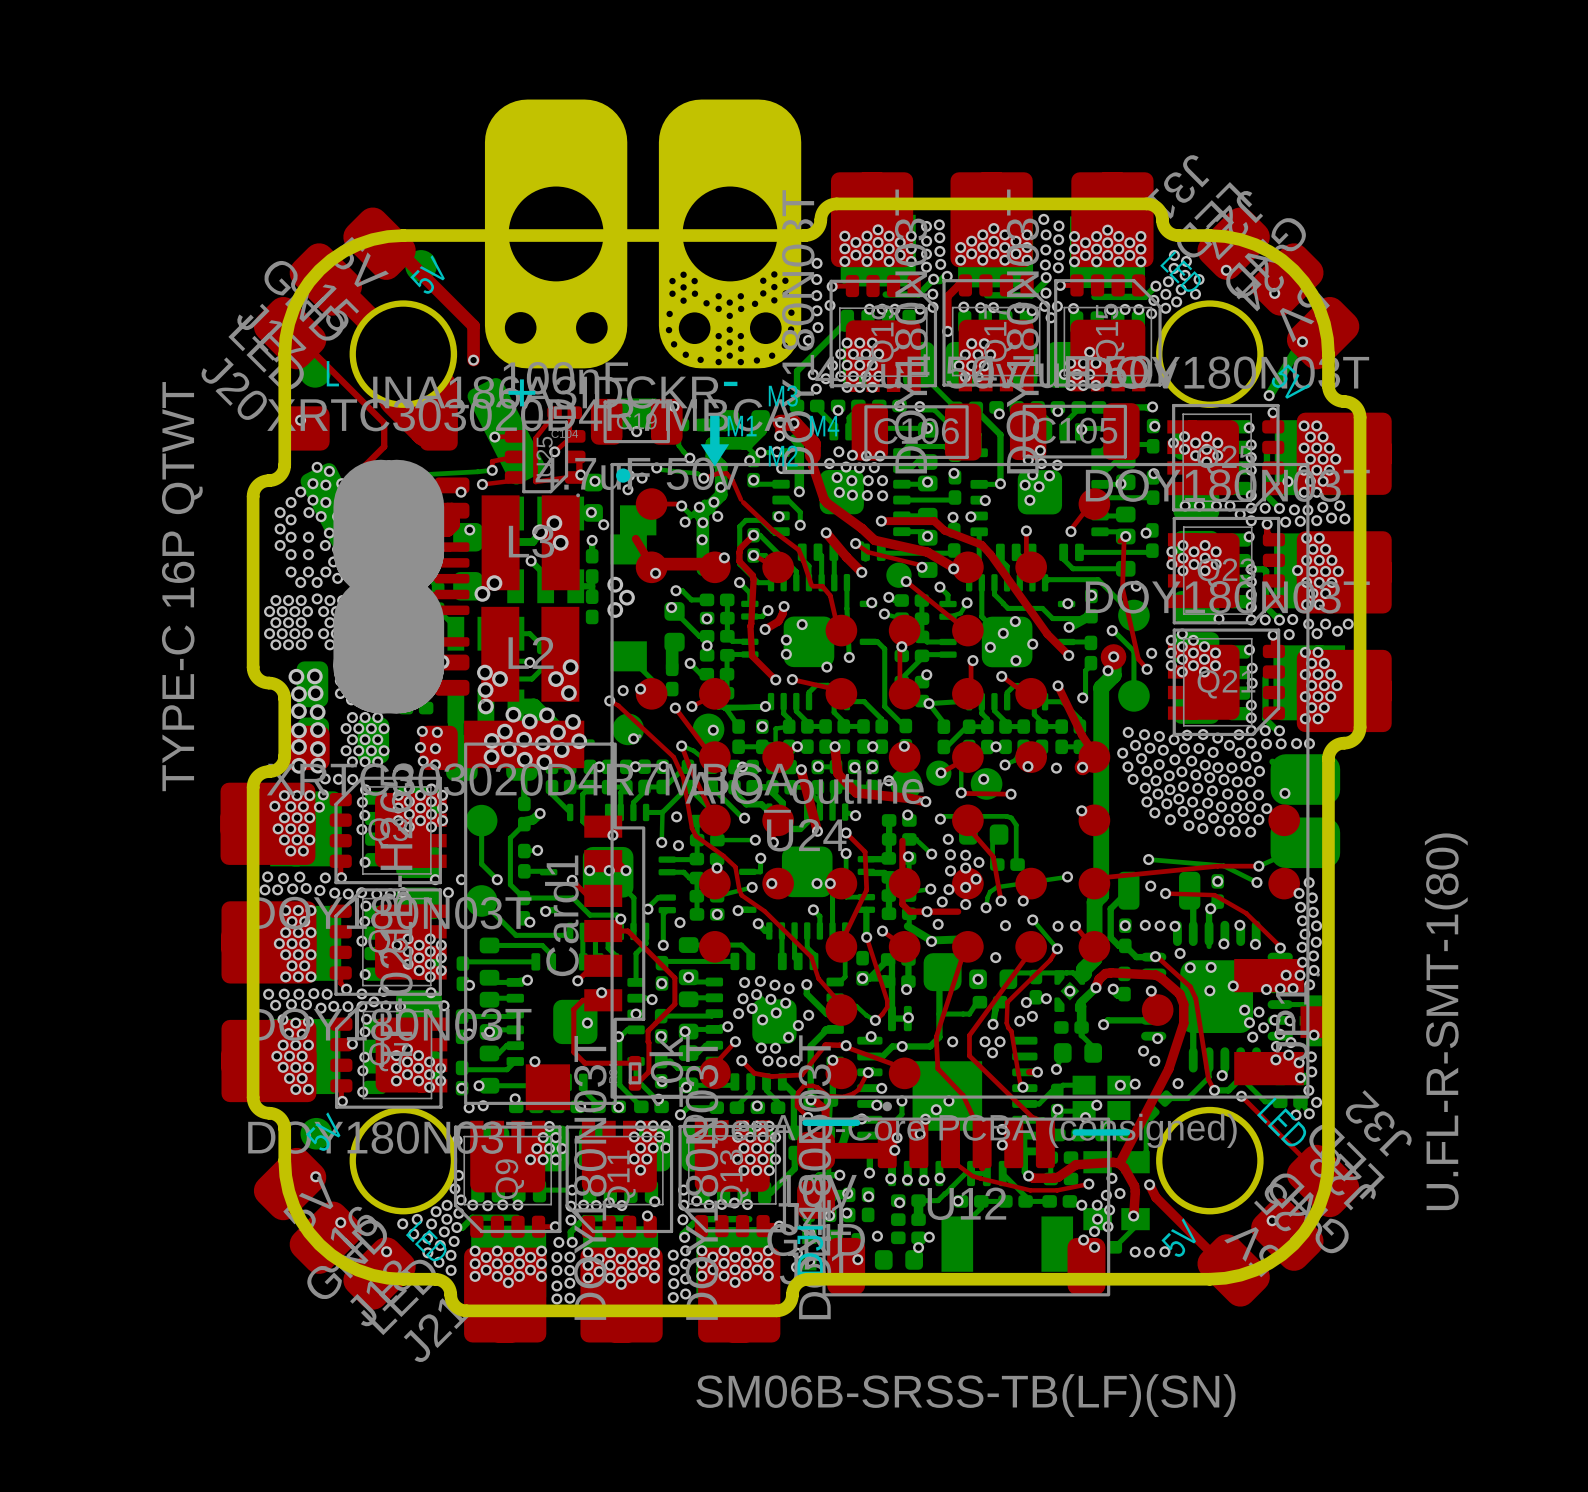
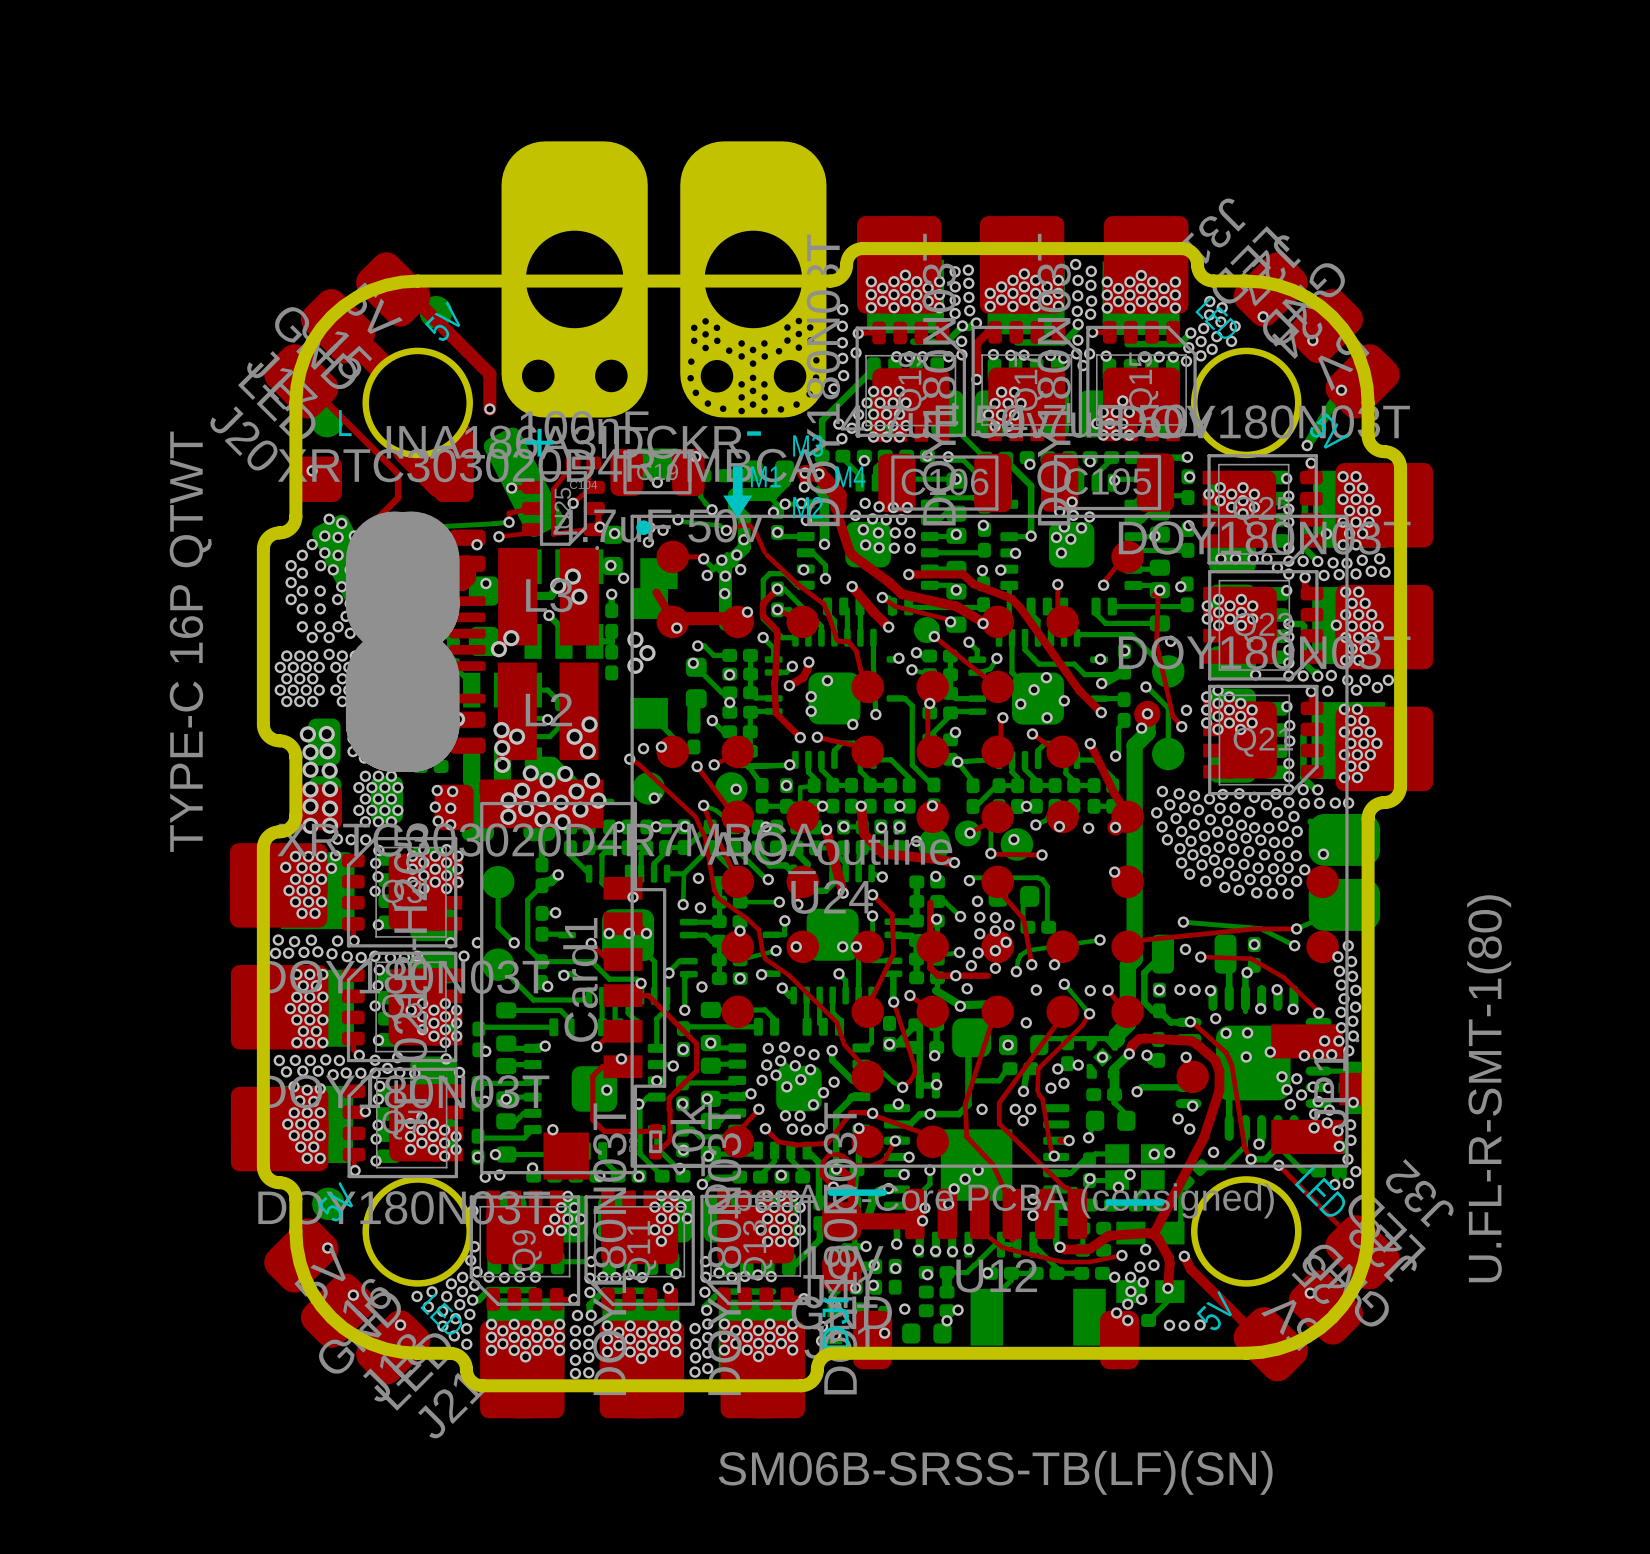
U12 footprint: [822, 1101, 1111, 1297] -> [853, 1188, 1140, 1370]

